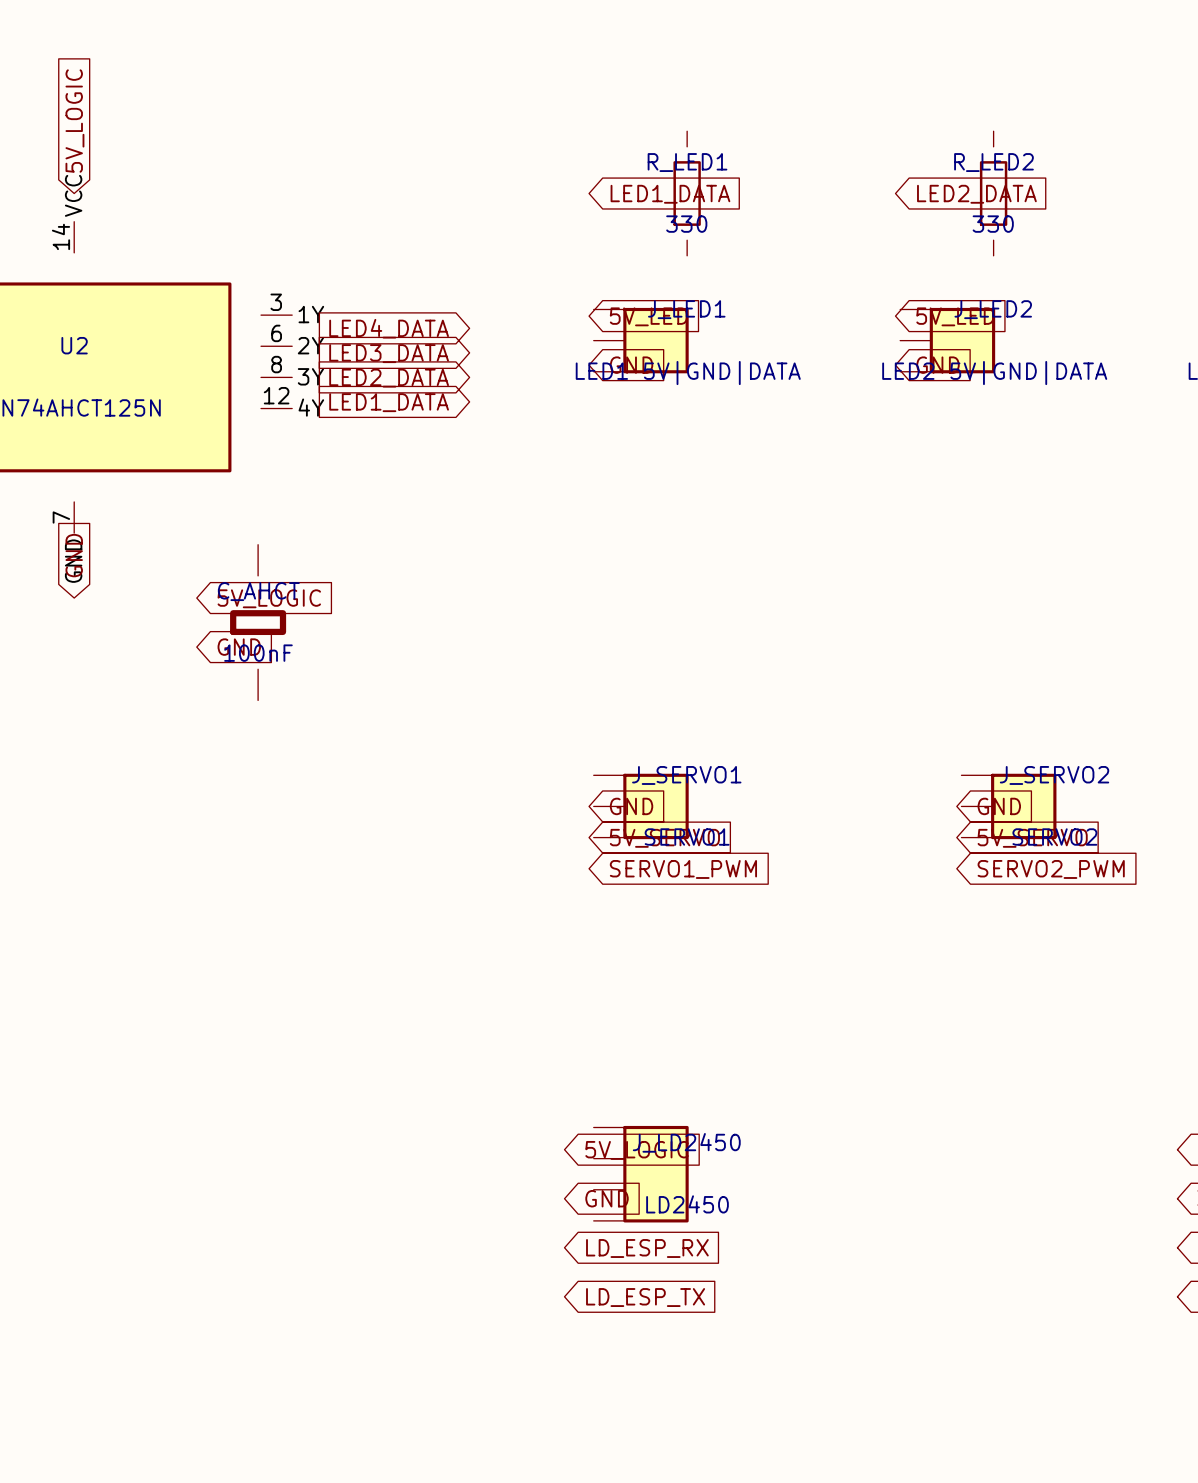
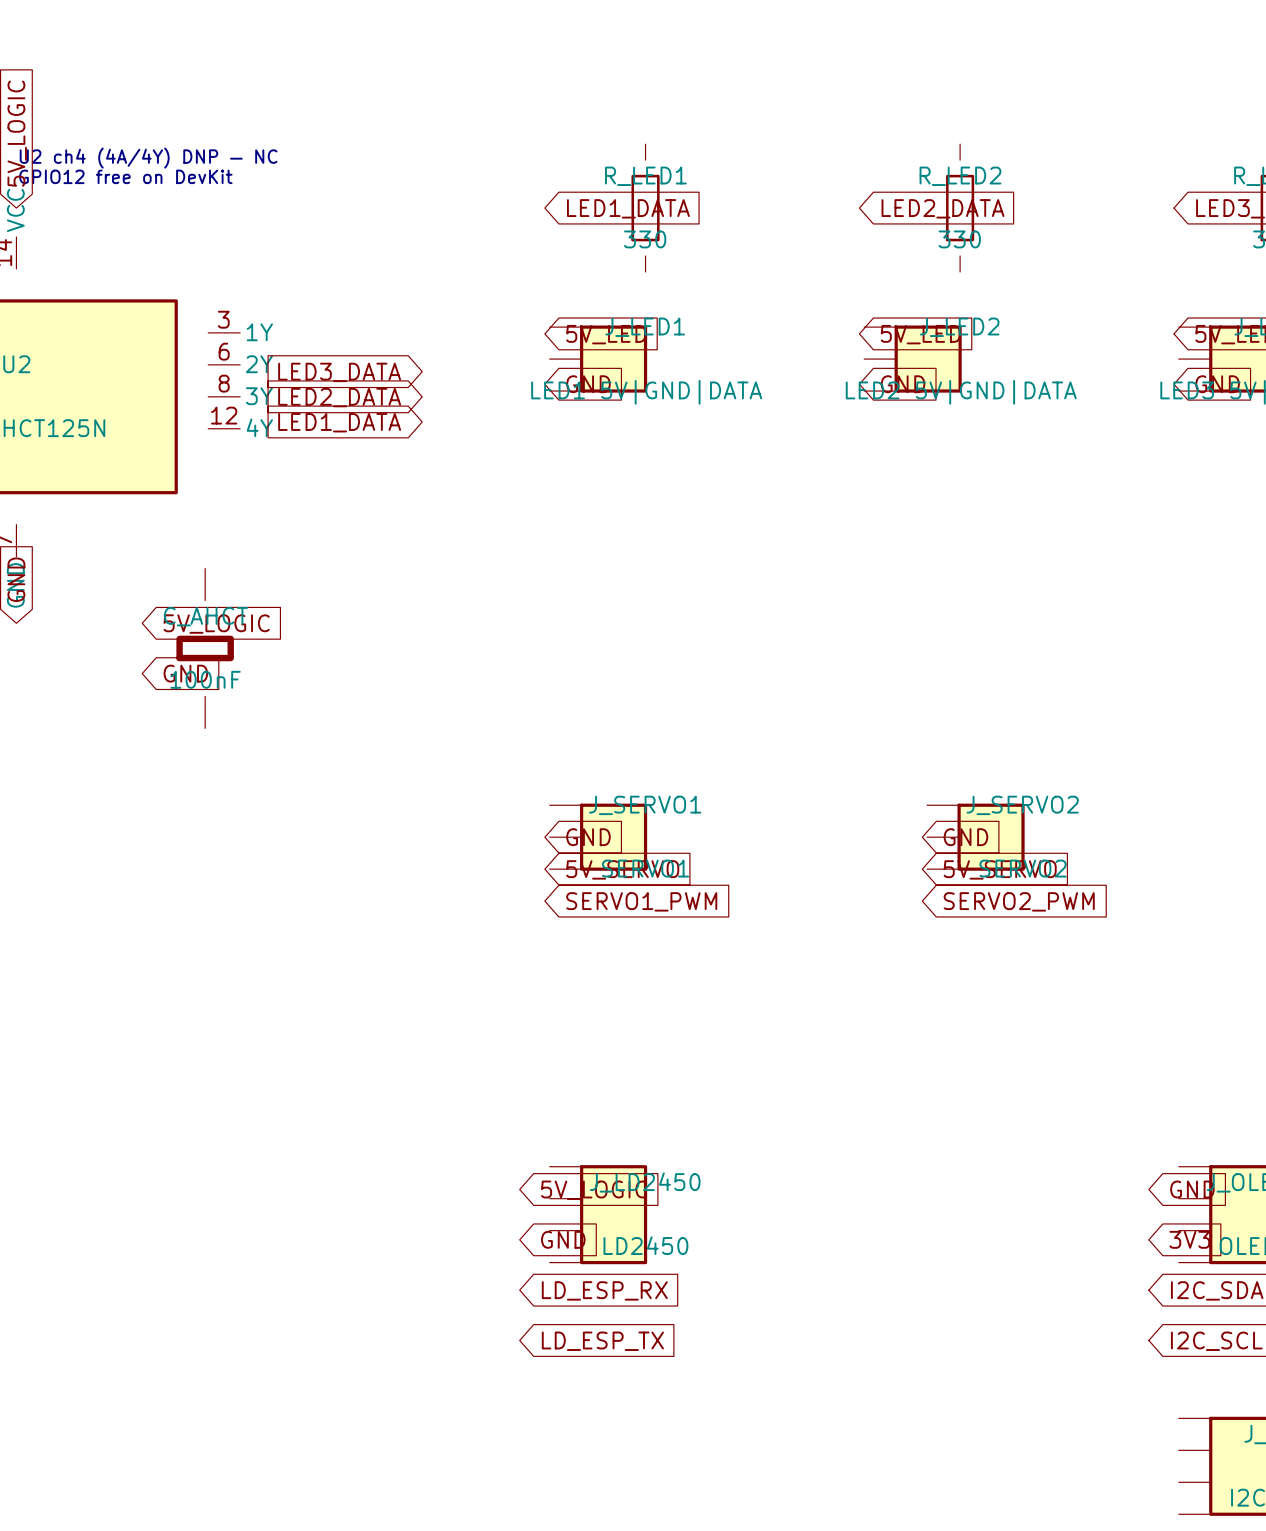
text: none -> U2 ch4 (4A/4Y) DNP — NC (148, 158)
text: none -> GPIO12 free on DevKit (125, 176)
global label: LED4_DATA (389, 328) -> none

